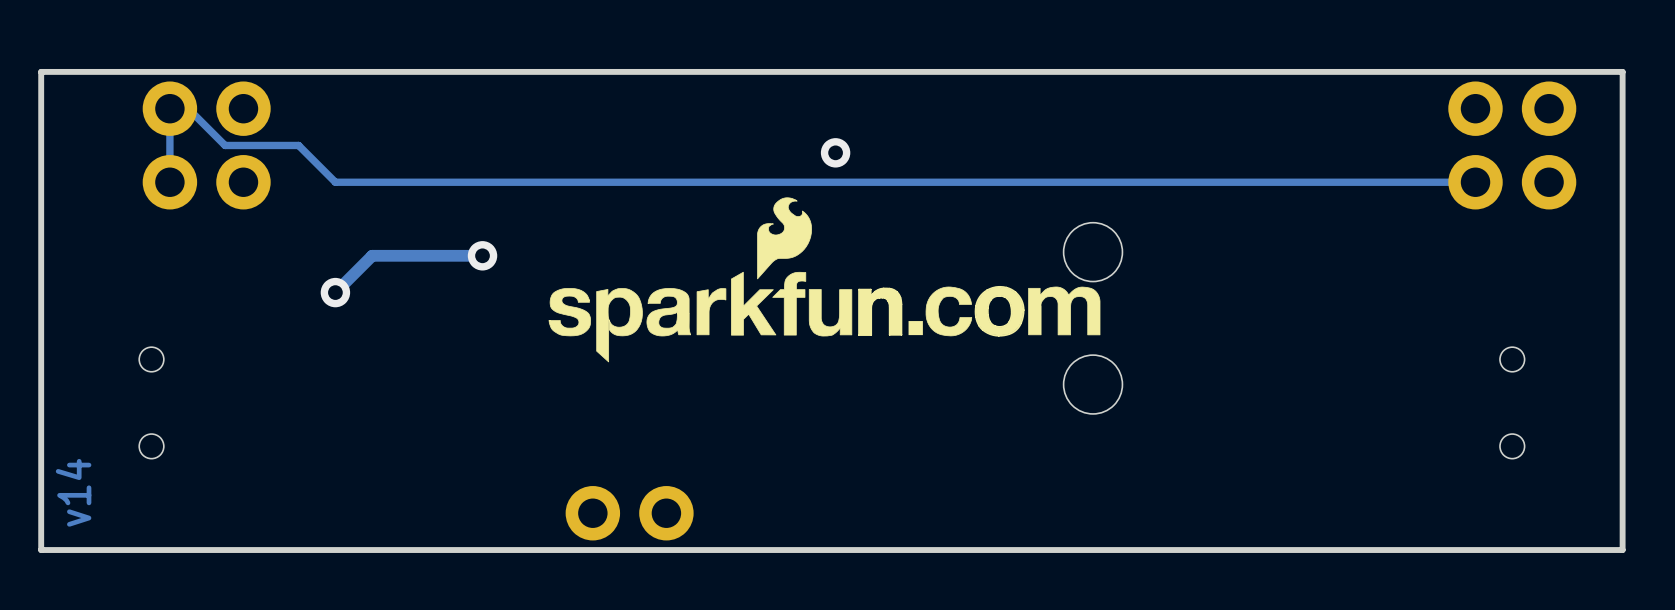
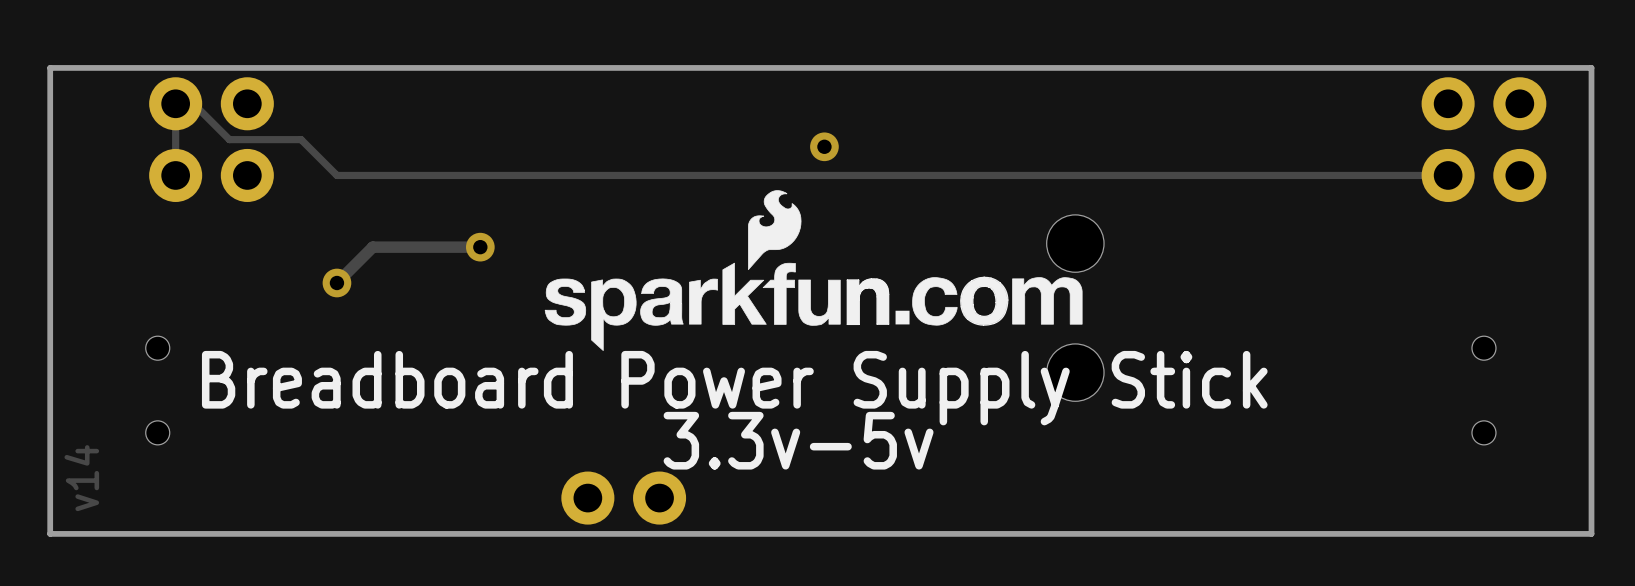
text: none -> Breadboard Power Supply Stick (734, 388)
text: none -> 3.3v-5v (798, 440)

